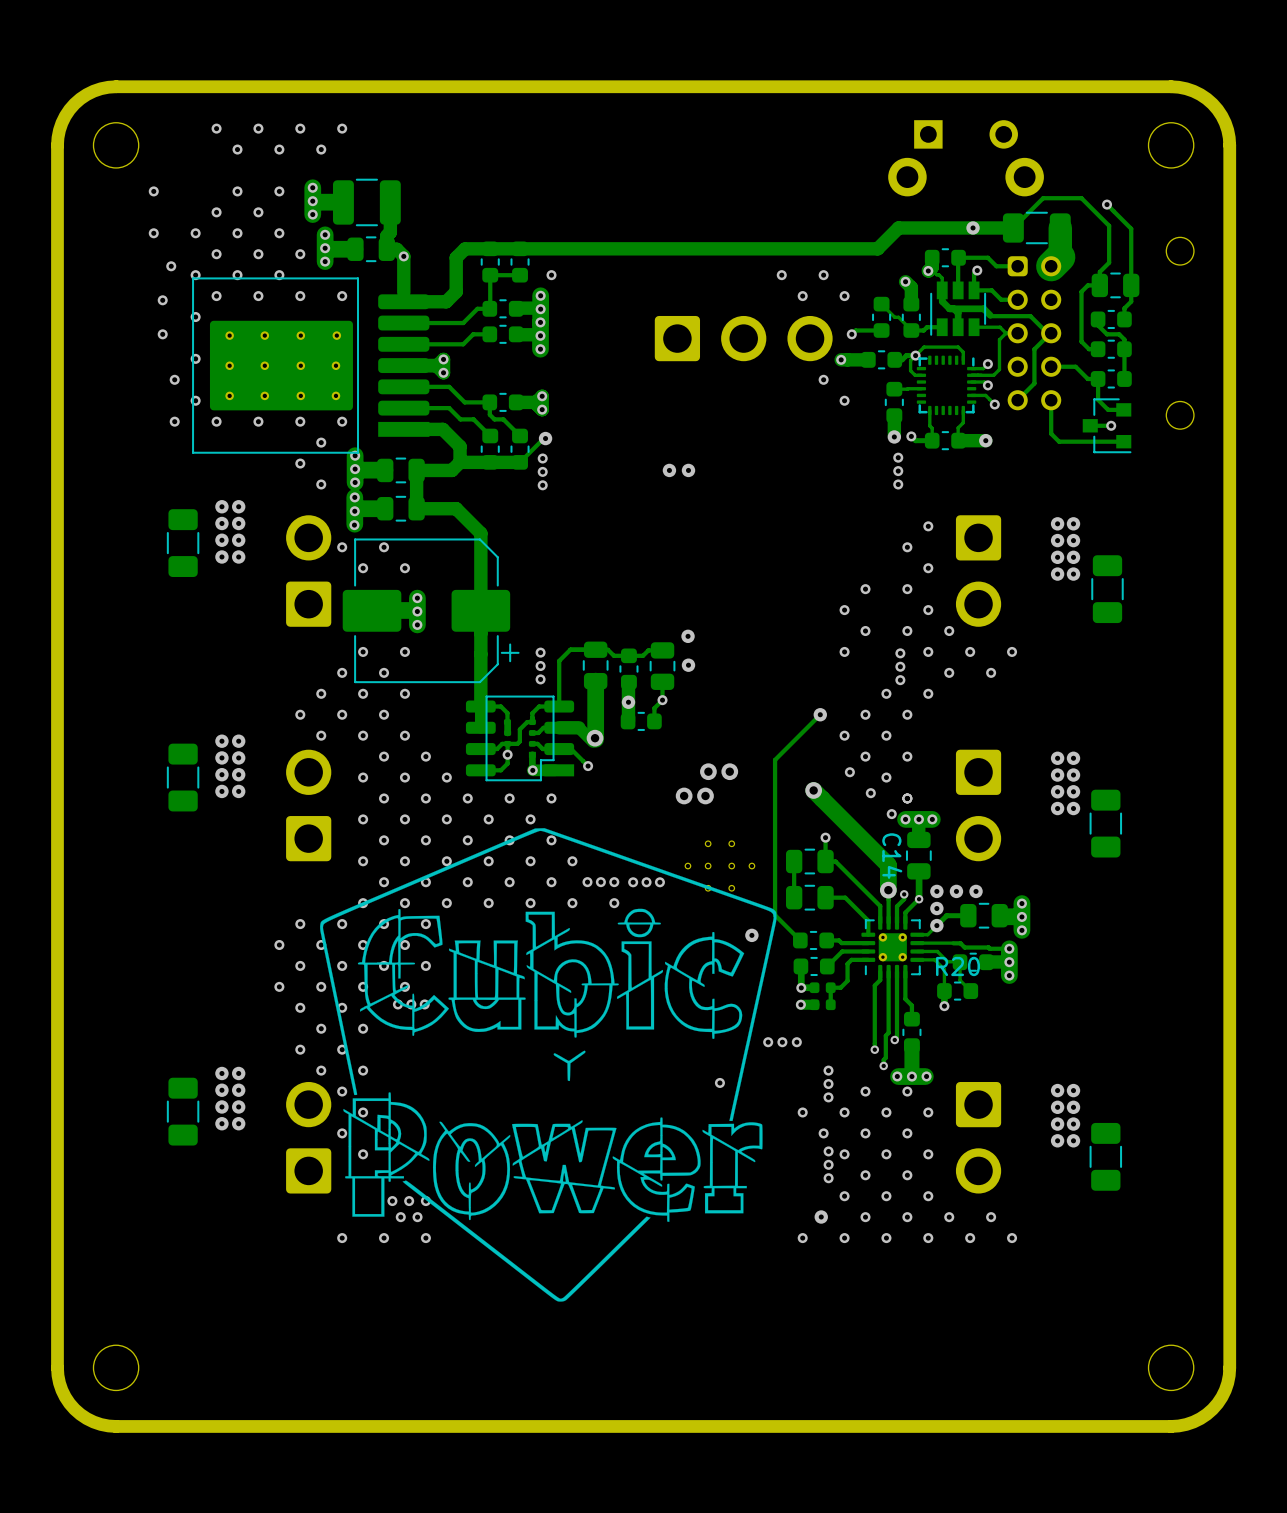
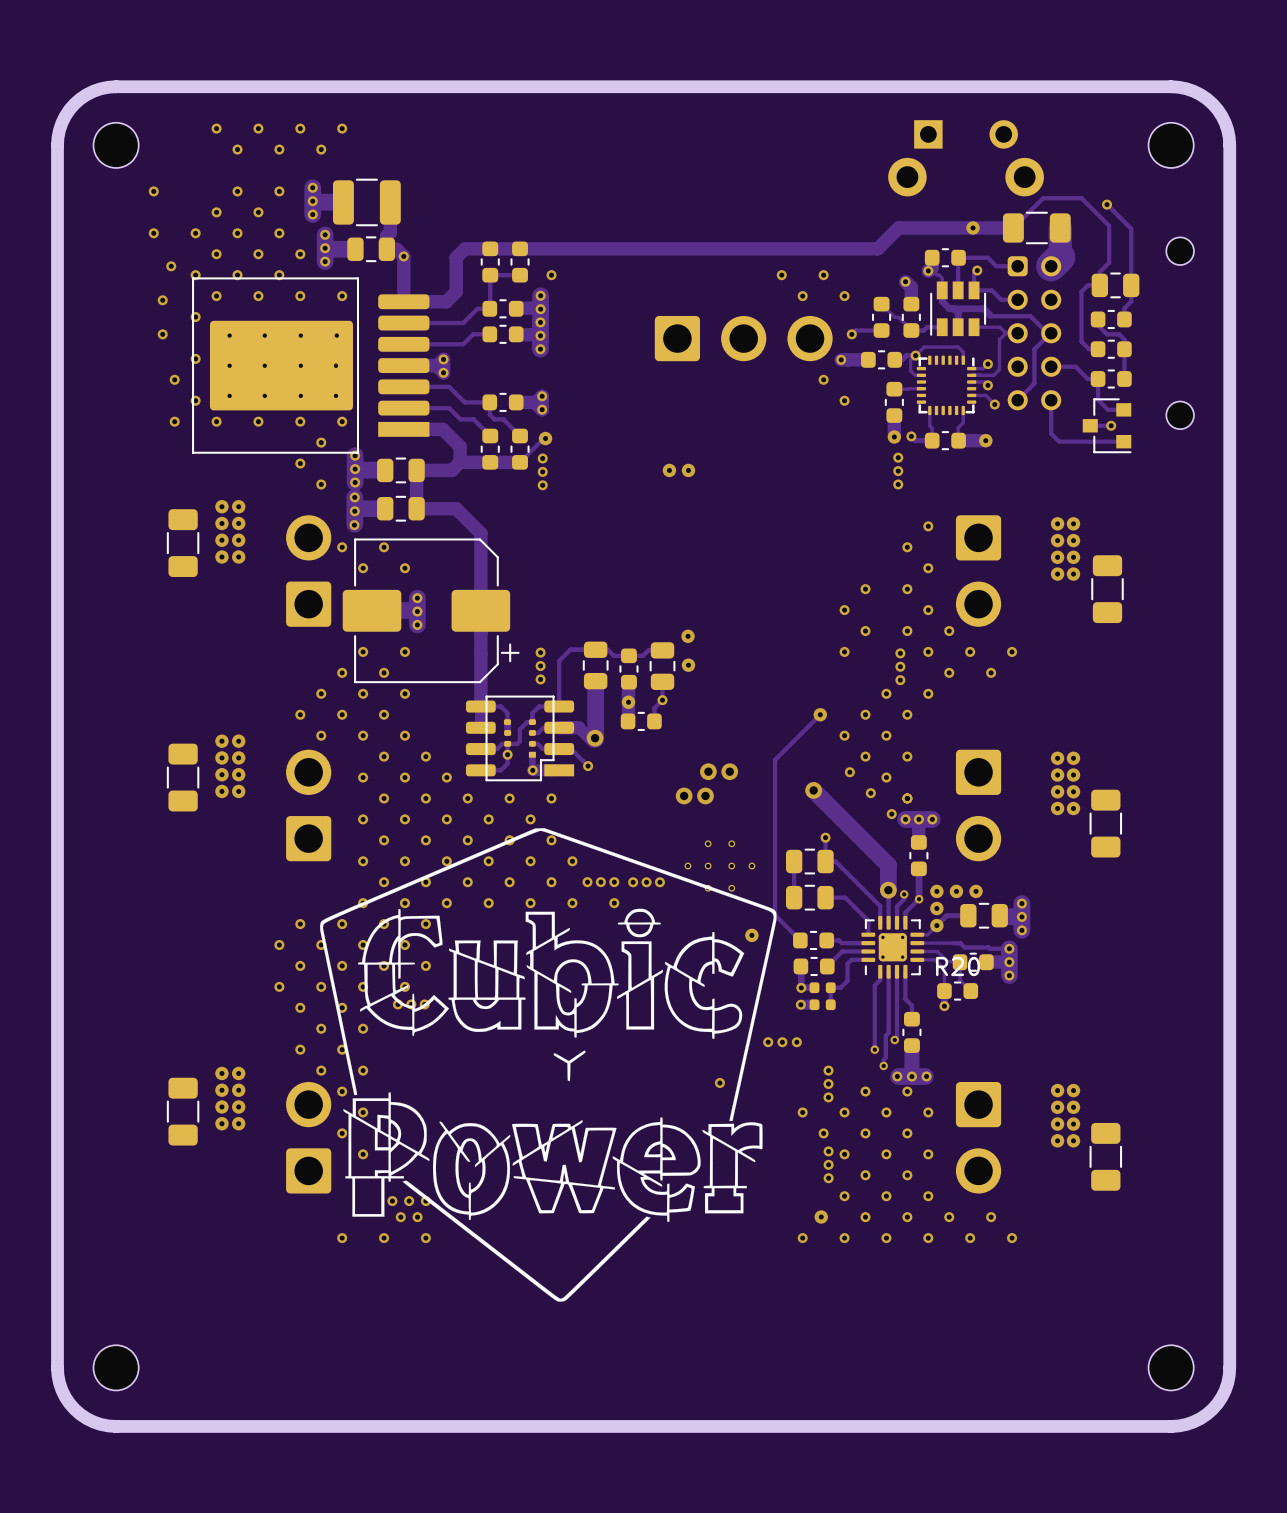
C14: (918, 855) -> none
part: none -> (918, 855)

